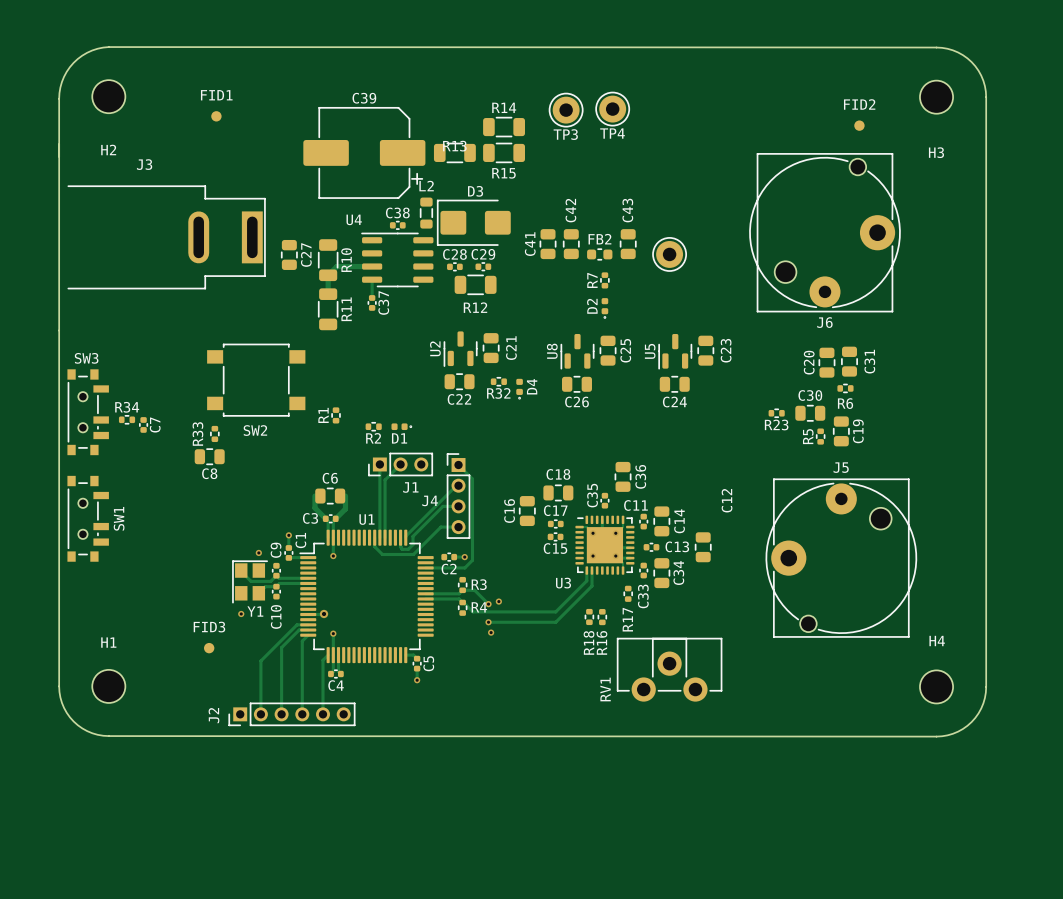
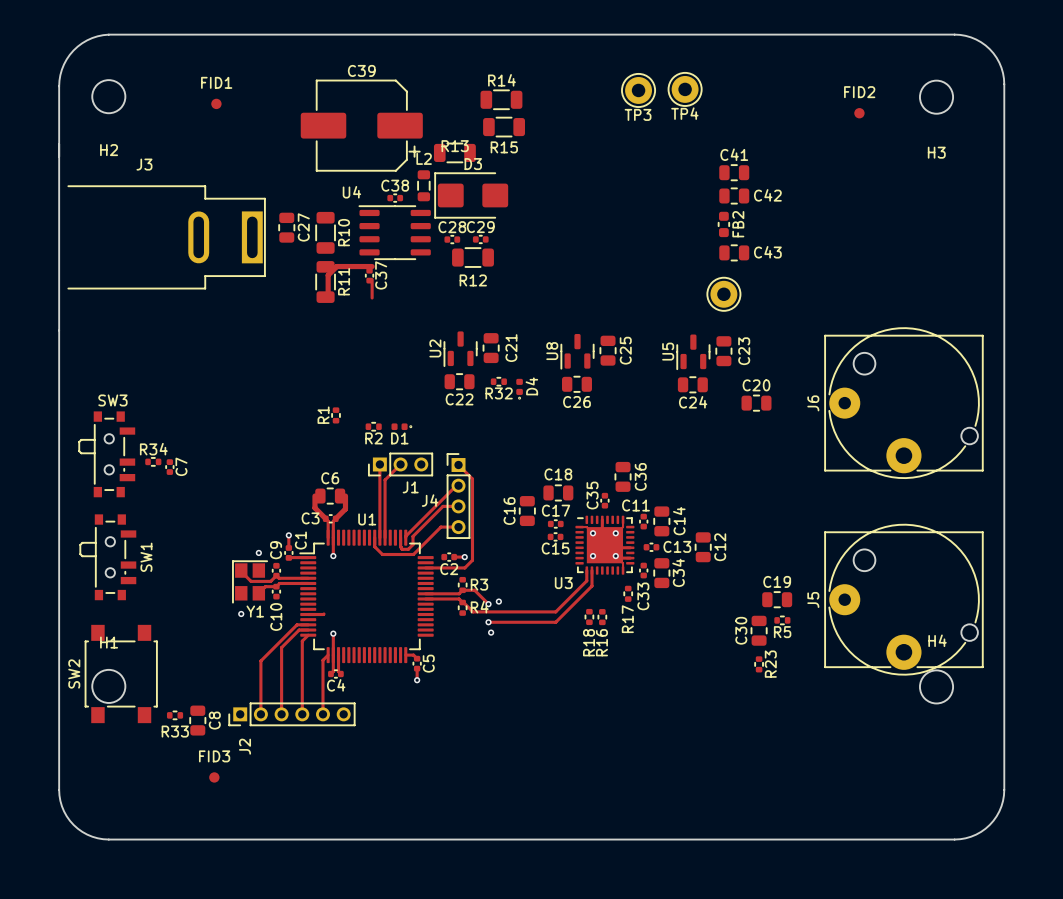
board edge: (59, 98) (64, 76) (73, 62) (92, 50) (108, 47) (942, 47) (958, 52) (971, 62) (981, 75) (986, 97) (986, 686) (984, 697) (978, 713) (962, 728) (947, 735) (936, 736) (108, 736) (92, 733) (73, 721) (64, 707) (59, 686) -> (59, 98) (60, 75) (69, 54) (87, 40) (108, 34) (954, 34) (971, 37) (985, 45) (999, 62) (1004, 84) (1003, 795) (999, 811) (985, 828) (971, 836) (954, 839) (103, 839) (87, 834) (77, 828) (66, 816) (61, 806) (59, 789) (59, 686)
R14: none -> (501, 99)
R14 name: R14 (504, 107) -> R15 (504, 147)
TP4 position: (612, 109) -> (685, 89)
TP3 position: (566, 110) -> (638, 90)
FID1 position: (216, 116) -> (216, 103)
FID2 position: (859, 125) -> (859, 113)
C39 position: (364, 152) -> (361, 125)
R15: (504, 152) -> none
L2 position: (426, 213) -> (423, 185)
D3 position: (473, 222) -> (471, 195)
C38 position: (397, 225) -> (395, 198)
J6 rotation: 0° (824, 232) -> 90° clockwise (903, 403)
J6 position: (824, 232) -> (903, 403)
C41 rotation: 0° (548, 244) -> 90° clockwise (734, 172)
C41 position: (548, 244) -> (734, 172)
C42 rotation: 0° (571, 244) -> 90° clockwise (734, 195)
C42 position: (571, 244) -> (734, 195)
C43 rotation: 0° (628, 244) -> 90° clockwise (734, 252)
C43 position: (628, 244) -> (734, 252)
C27 position: (289, 254) -> (286, 227)
FB2 rotation: 0° (599, 254) -> 90° clockwise (723, 224)
FB2 position: (599, 254) -> (723, 224)
part position: (669, 254) -> (723, 294)
U4 position: (397, 259) -> (394, 232)
R10 position: (328, 260) -> (325, 232)
C28 position: (454, 266) -> (452, 239)
C29 position: (483, 266) -> (480, 239)
R7: (604, 280) -> none
R12 position: (475, 284) -> (473, 257)
C37 position: (372, 302) -> (369, 275)
D2: (604, 308) -> none
R11 position: (328, 309) -> (325, 282)
C23 position: (705, 350) -> (723, 351)
U5 position: (675, 351) -> (693, 352)
C31: (849, 361) -> none
C20 rotation: 0° (826, 362) -> 90° clockwise (756, 403)
C20 position: (826, 362) -> (756, 403)
SW3 footprint: [67, 369, 109, 456] -> [78, 411, 136, 498]
SW2 rotation: 0° (256, 380) -> 90° clockwise (121, 673)
SW2 position: (256, 380) -> (121, 673)
C24 position: (674, 384) -> (692, 384)
R6: (845, 388) -> none
C30 name position: C30 (810, 395) -> C30 (741, 630)
R23 rotation: 0° (776, 413) -> 90° clockwise (759, 664)
R23 position: (776, 413) -> (759, 664)
C30 rotation: 0° (810, 413) -> 90° clockwise (759, 630)
C30 position: (810, 413) -> (759, 630)
R34 position: (127, 419) -> (153, 461)
C7 position: (143, 424) -> (169, 467)
C19 rotation: 0° (841, 431) -> 90° clockwise (777, 599)
C19 position: (841, 431) -> (777, 599)
C19 name position: C19 (858, 431) -> C19 (777, 581)
R33 rotation: 0° (214, 433) -> 90° clockwise (175, 715)
R33 position: (214, 433) -> (175, 715)
R33 name position: R33 (197, 434) -> R33 (175, 731)
R5 rotation: 0° (820, 436) -> 90° clockwise (782, 620)
R5 position: (820, 436) -> (782, 620)
C8 rotation: 0° (209, 456) -> 90° clockwise (197, 720)
C8 position: (209, 456) -> (197, 720)
C8 name position: C8 (209, 473) -> C8 (214, 720)
SW1 footprint: [67, 475, 109, 562] -> [79, 514, 137, 601]
C12 name position: C12 (727, 500) -> C12 (720, 547)
J5 rotation: 0° (841, 558) -> 90° counterclockwise (903, 599)
via: (324, 613) -> none
FID3 position: (209, 648) -> (214, 777)
RV1: (669, 669) -> none
J2 name position: J2 (213, 715) -> J2 (245, 746)

